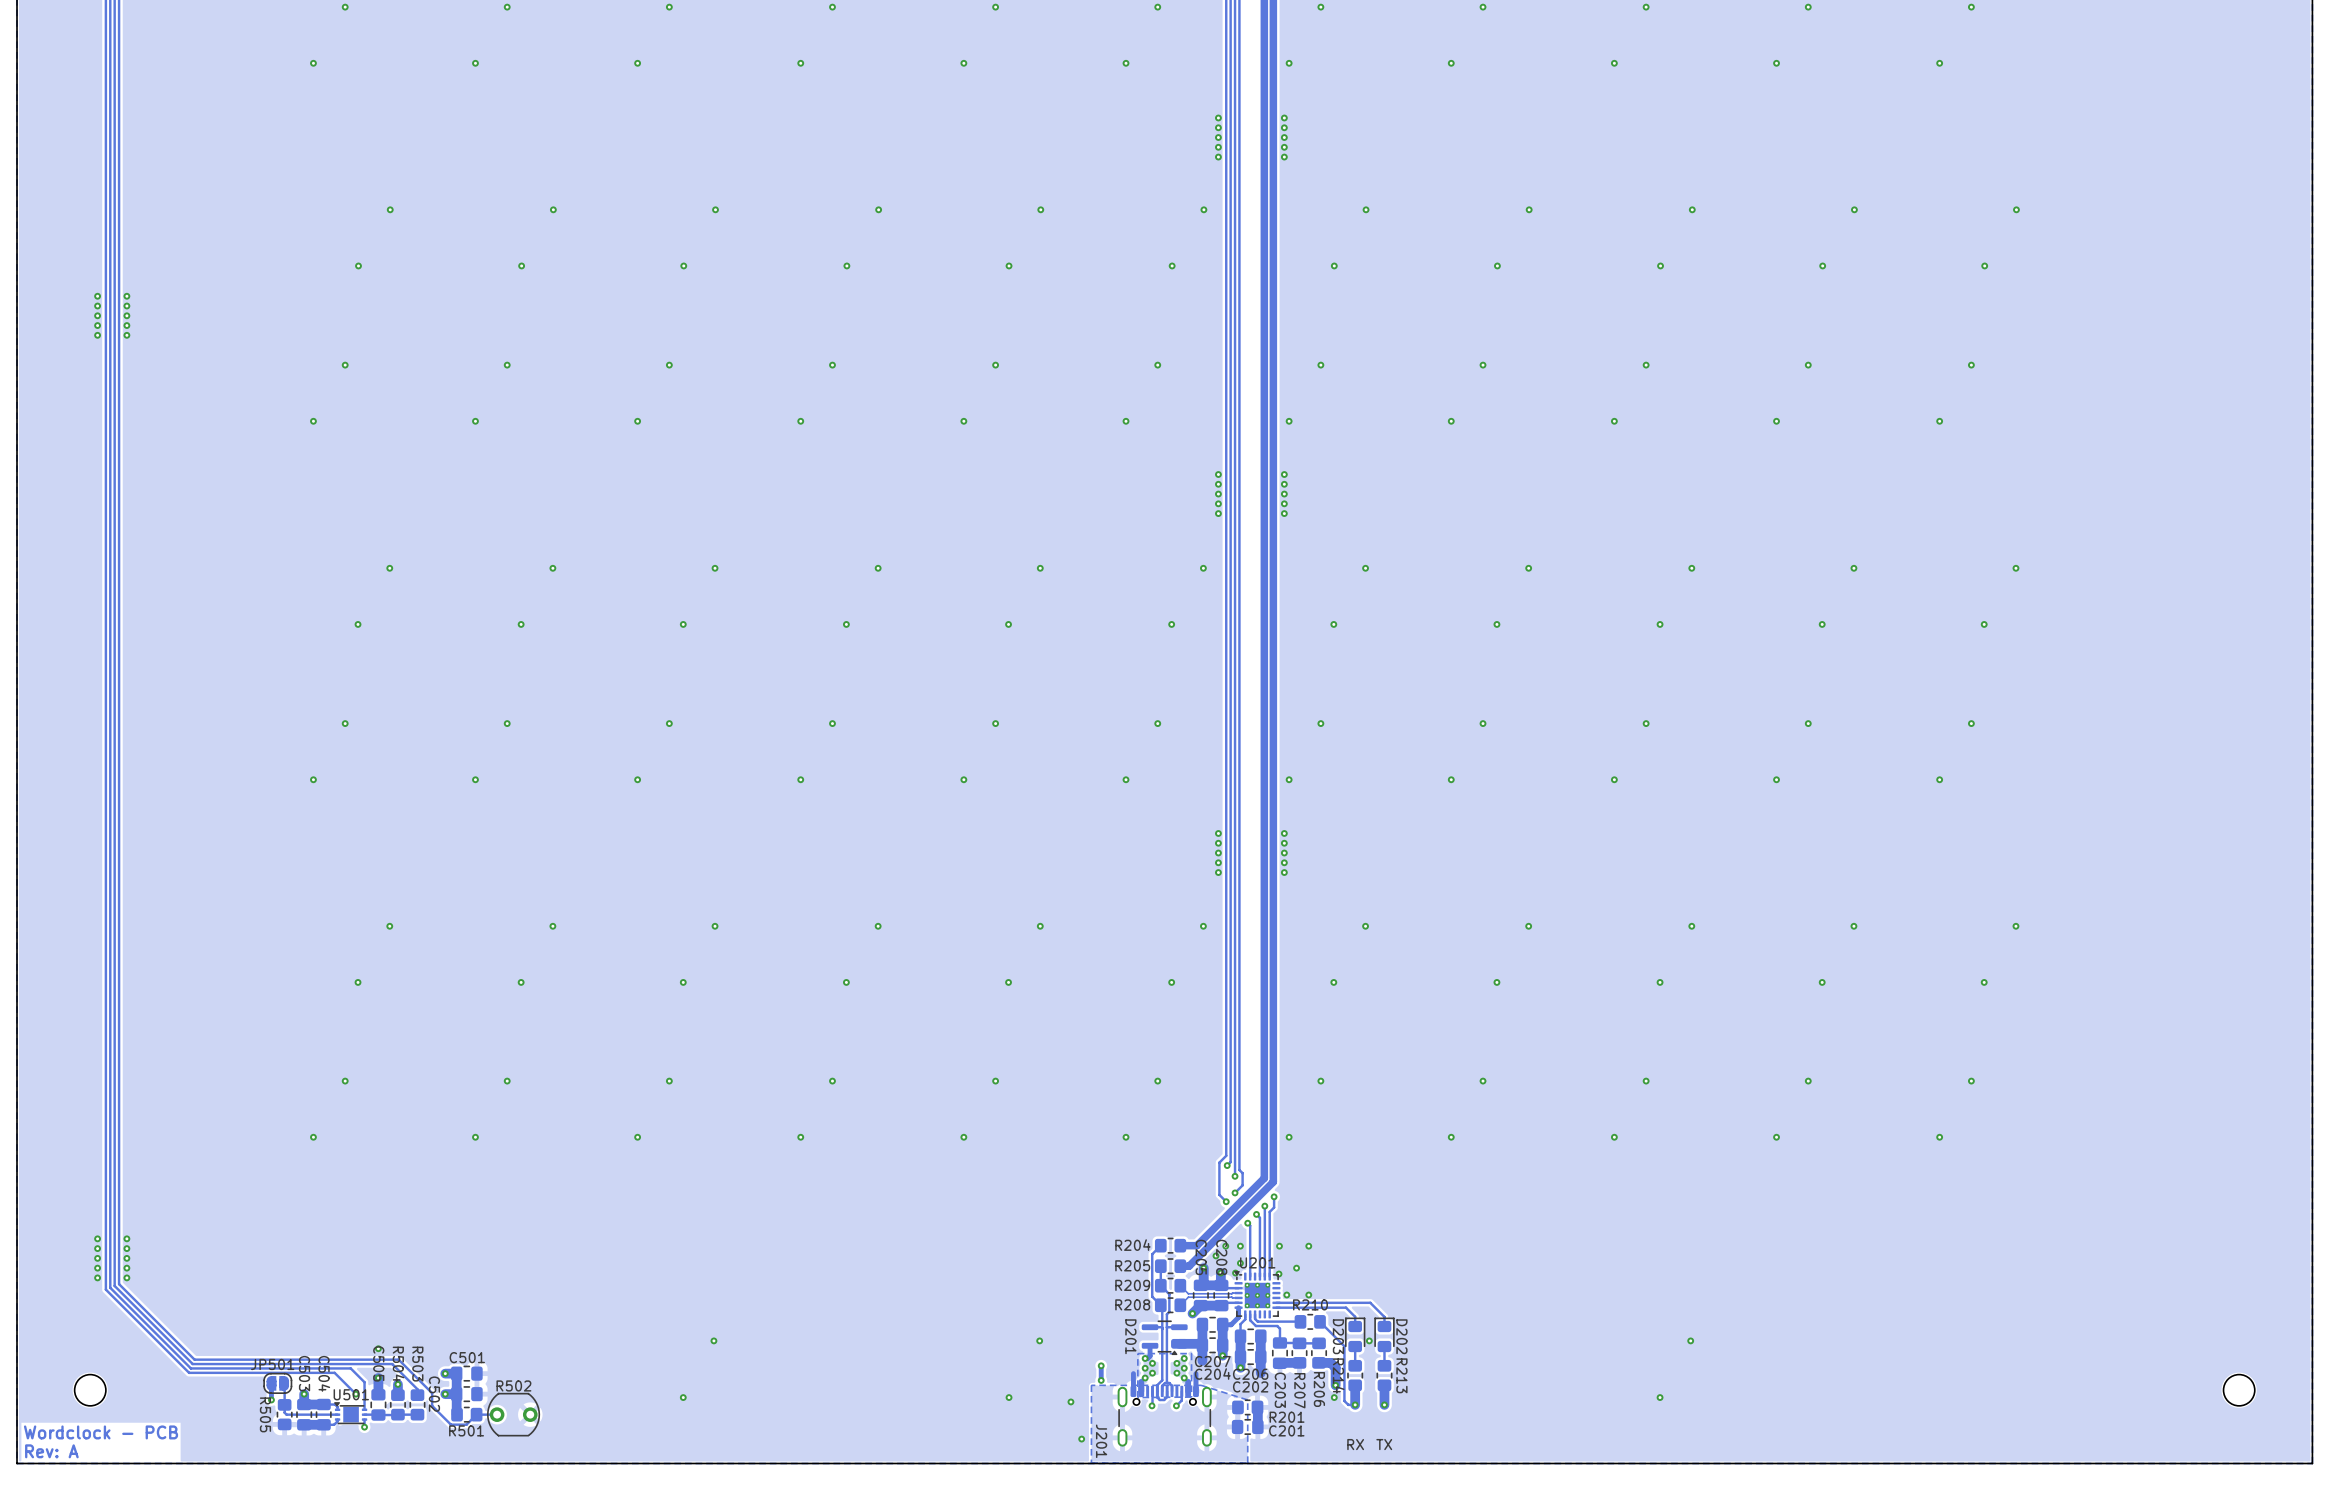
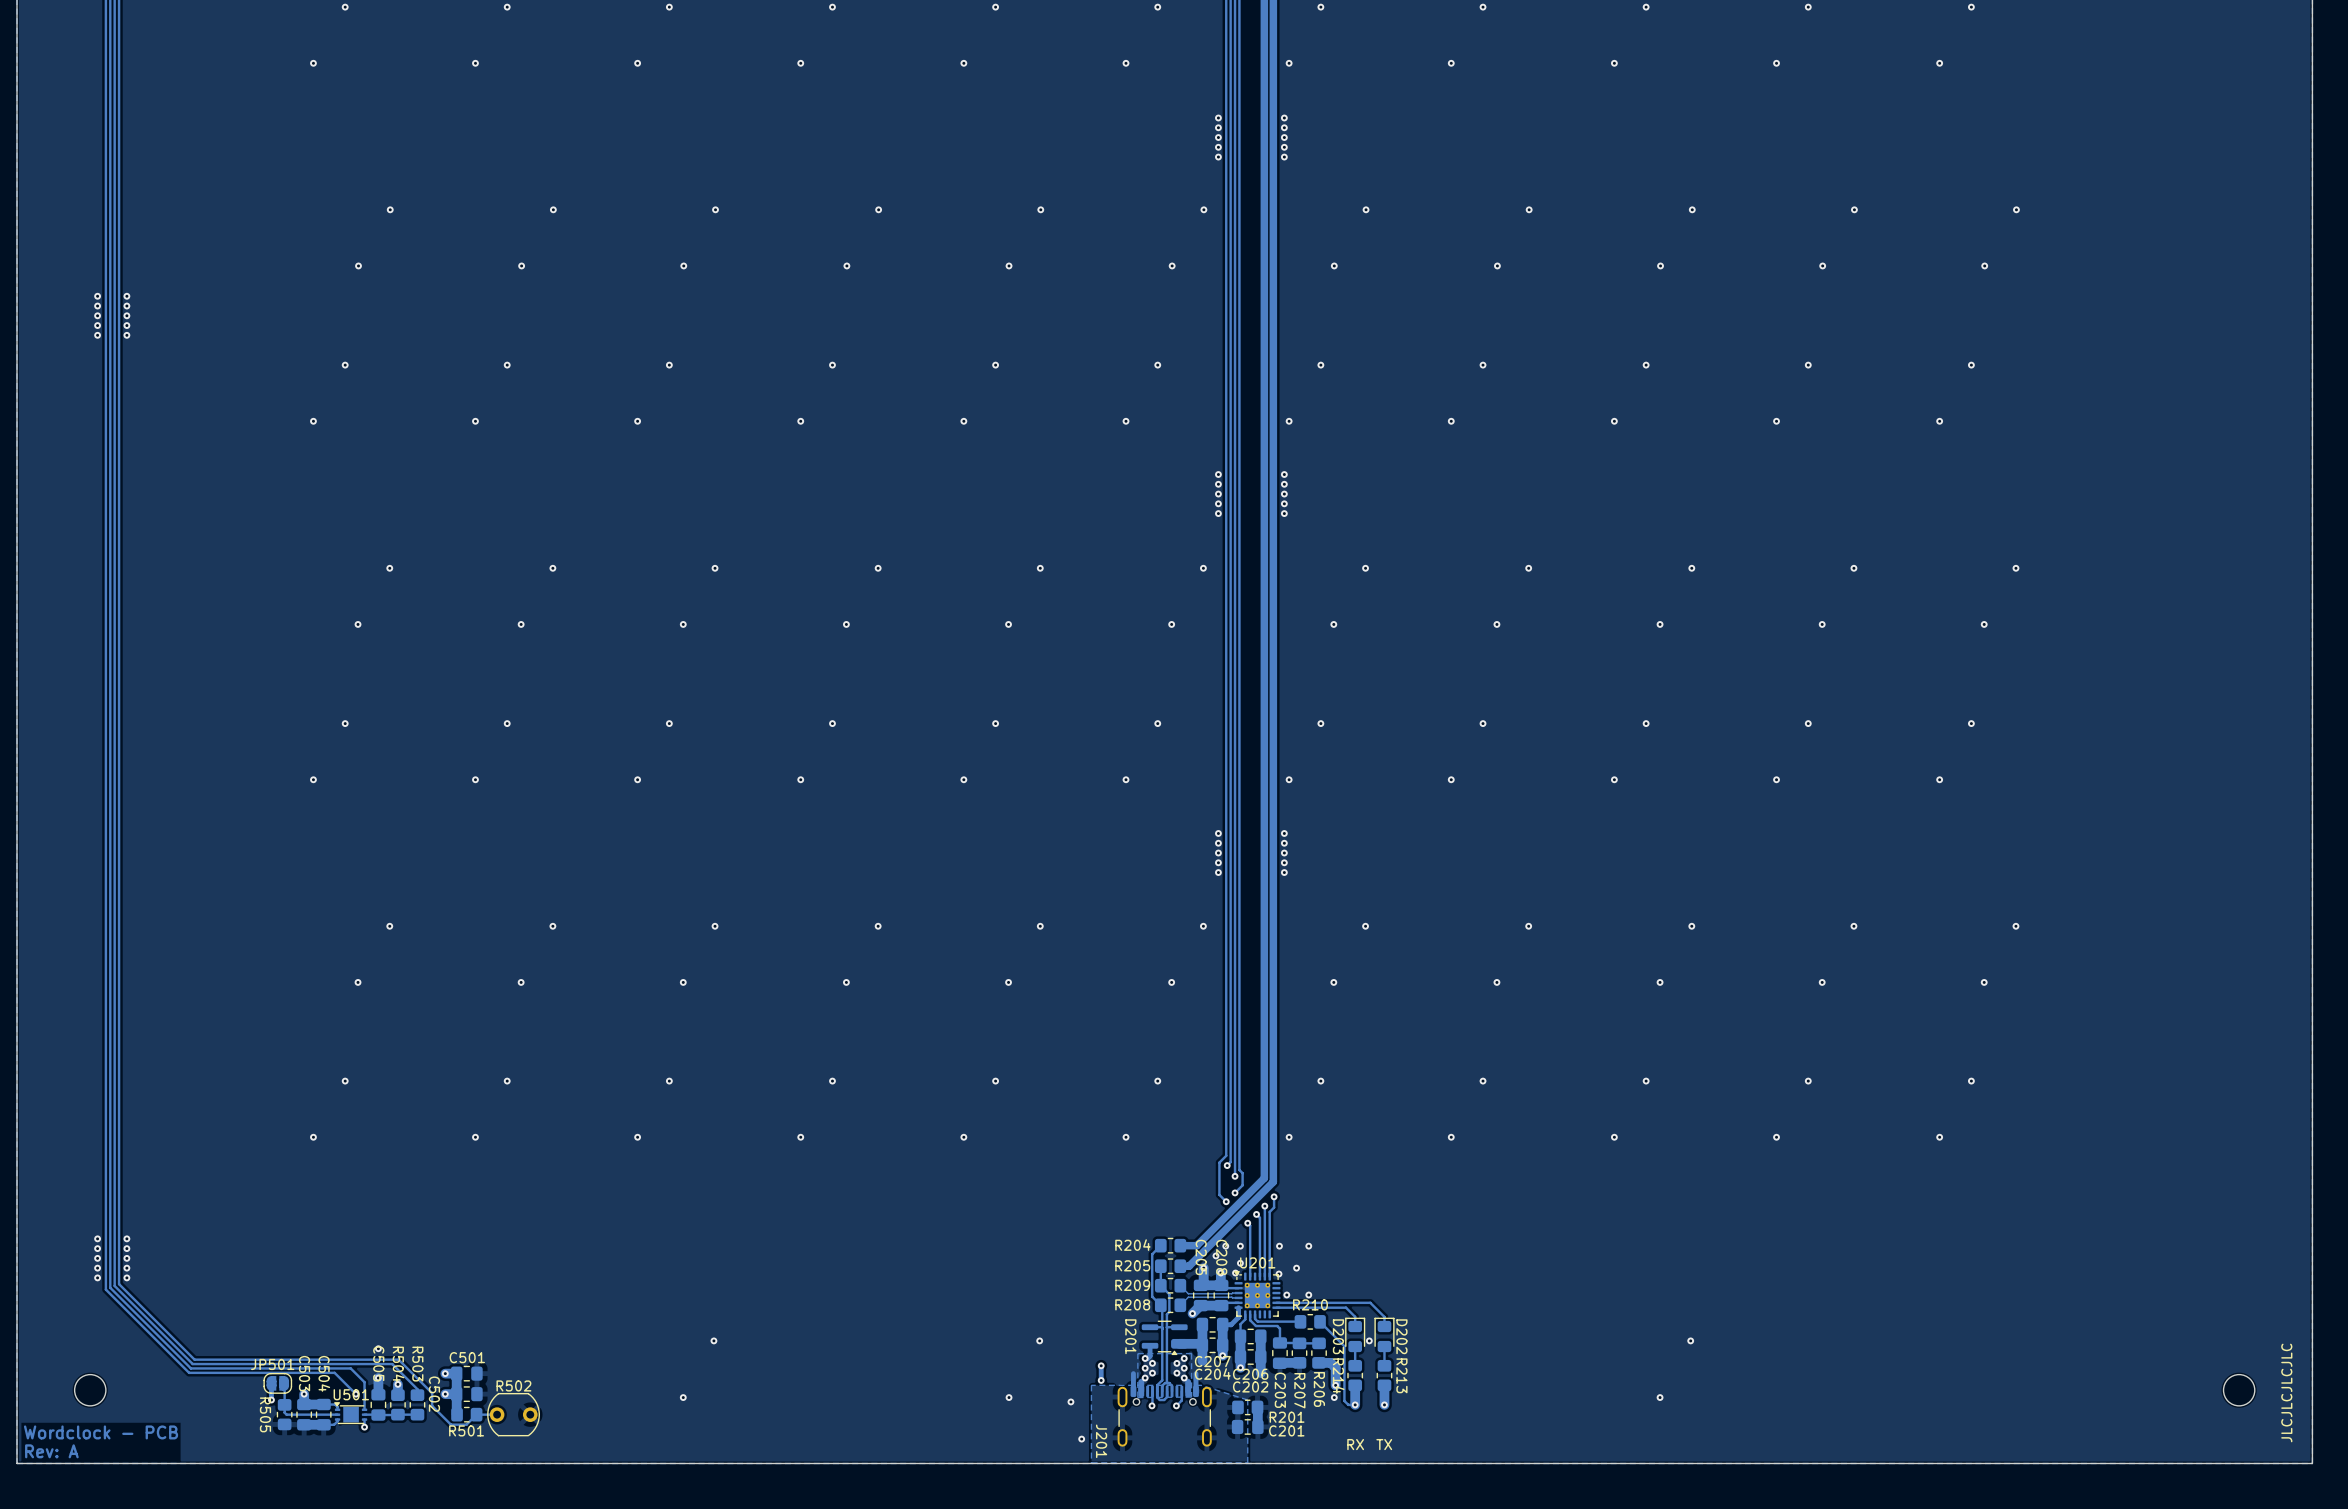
text: none -> JLCJLCJLCJLC (2286, 1392)

